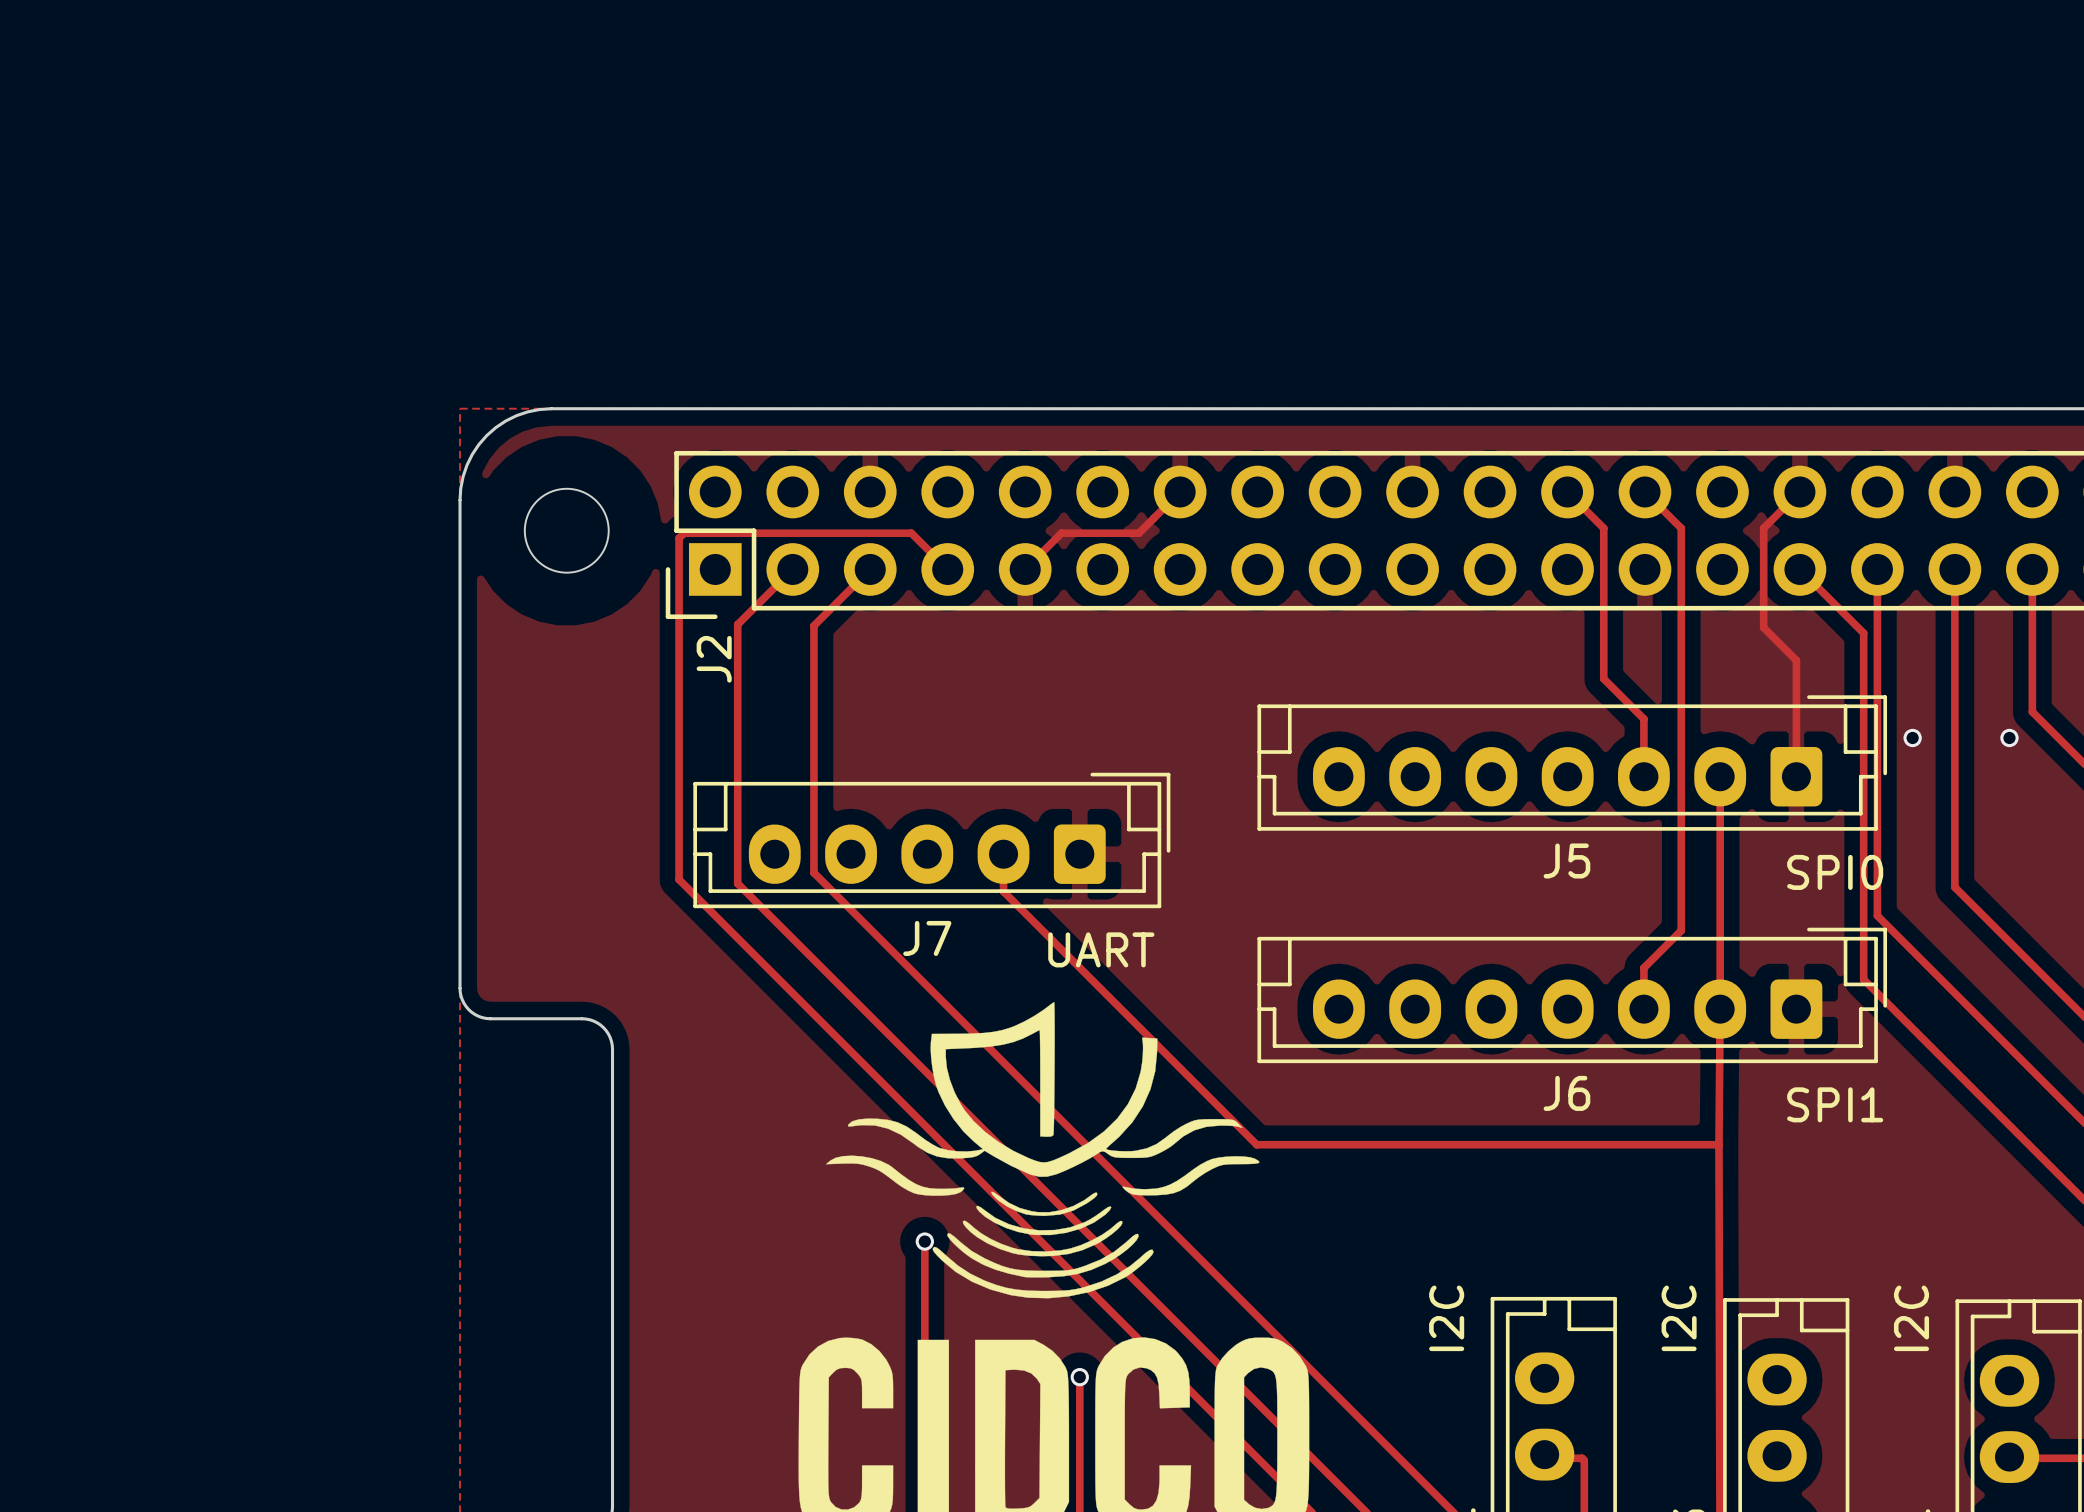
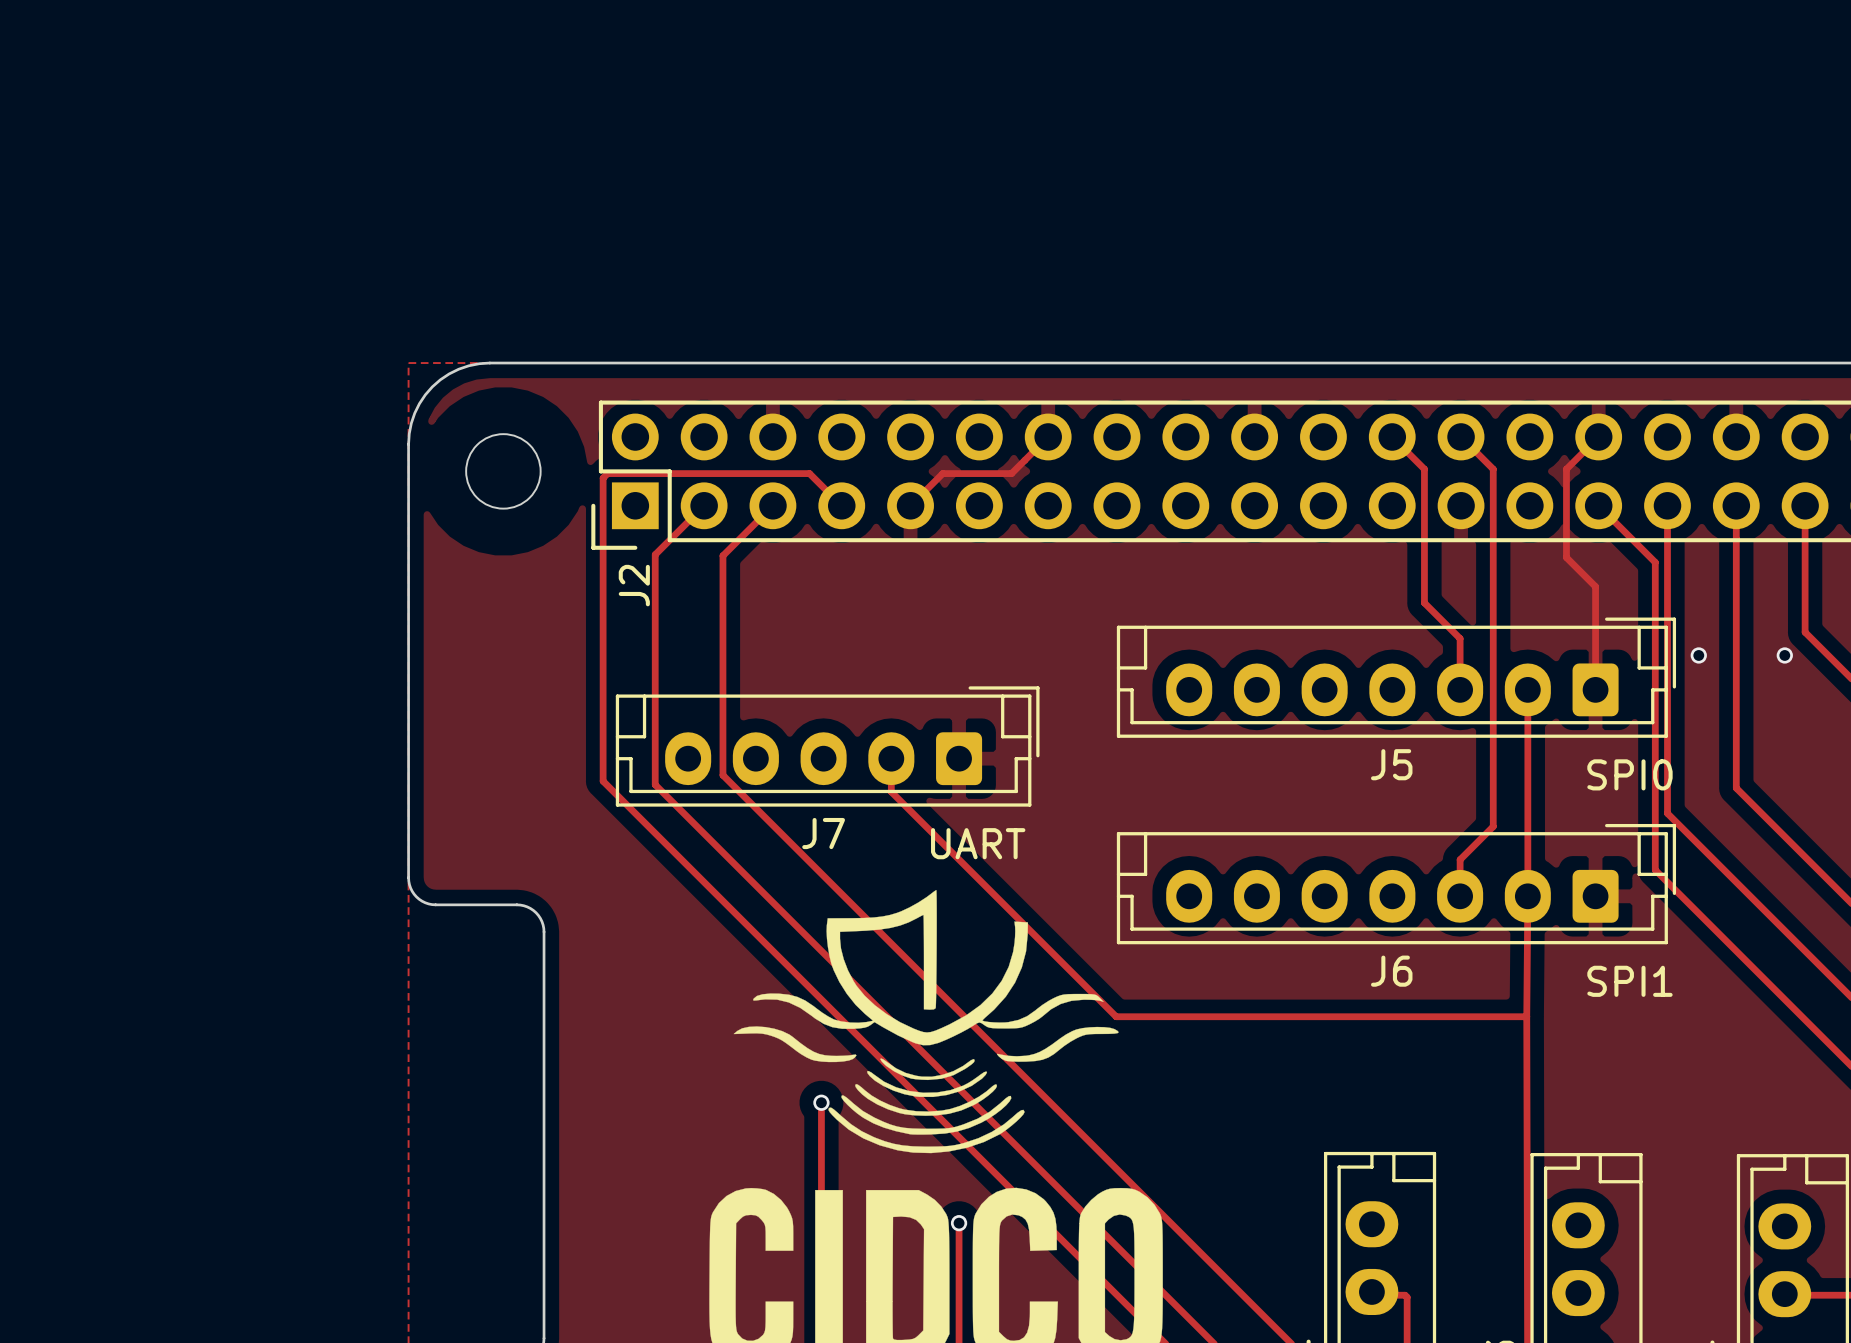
text: I2C (1446, 1318) -> none
text: I2C (1679, 1318) -> none
text: I2C (1911, 1318) -> none

